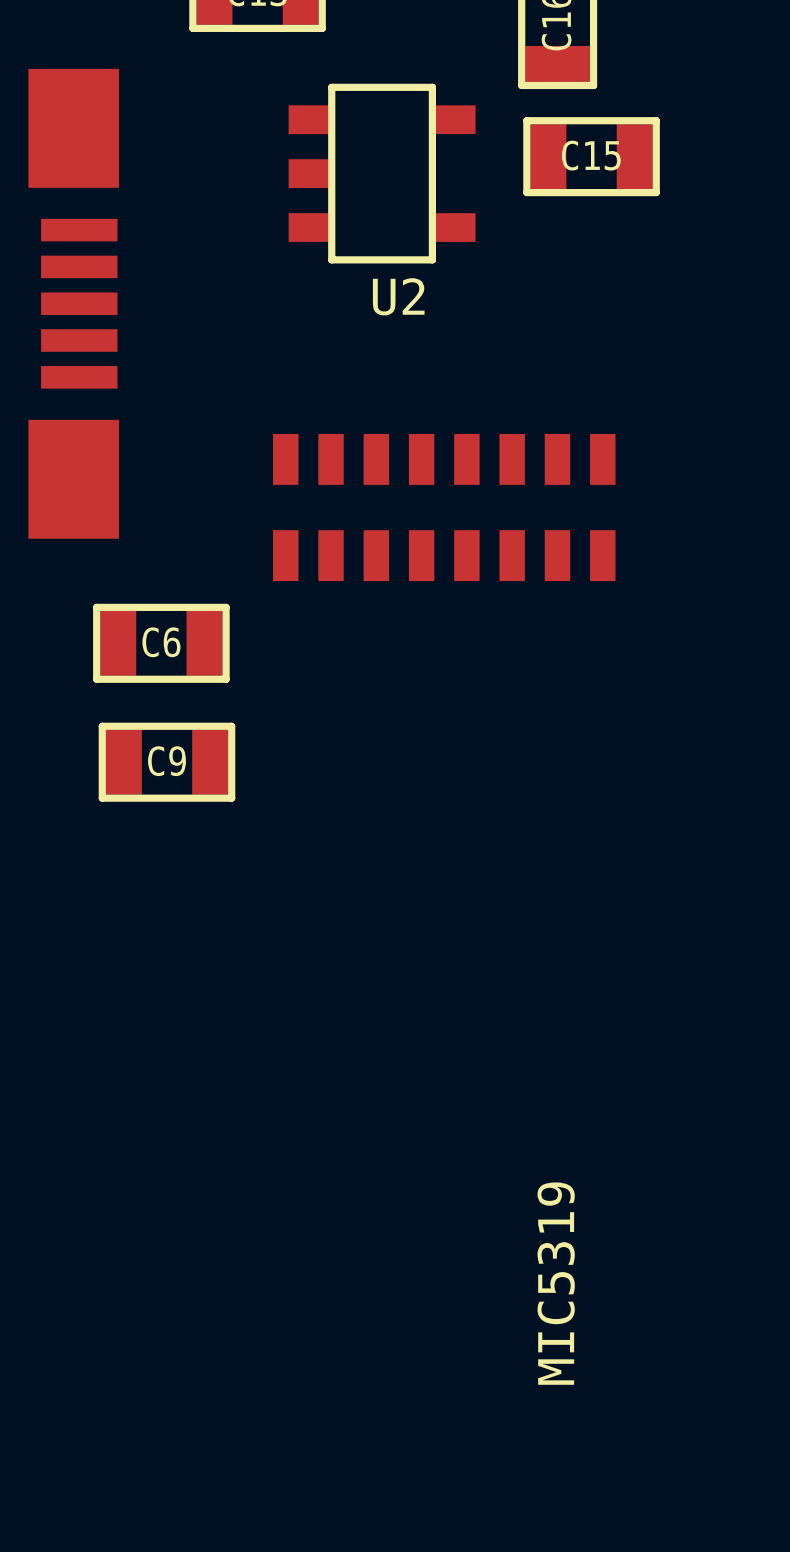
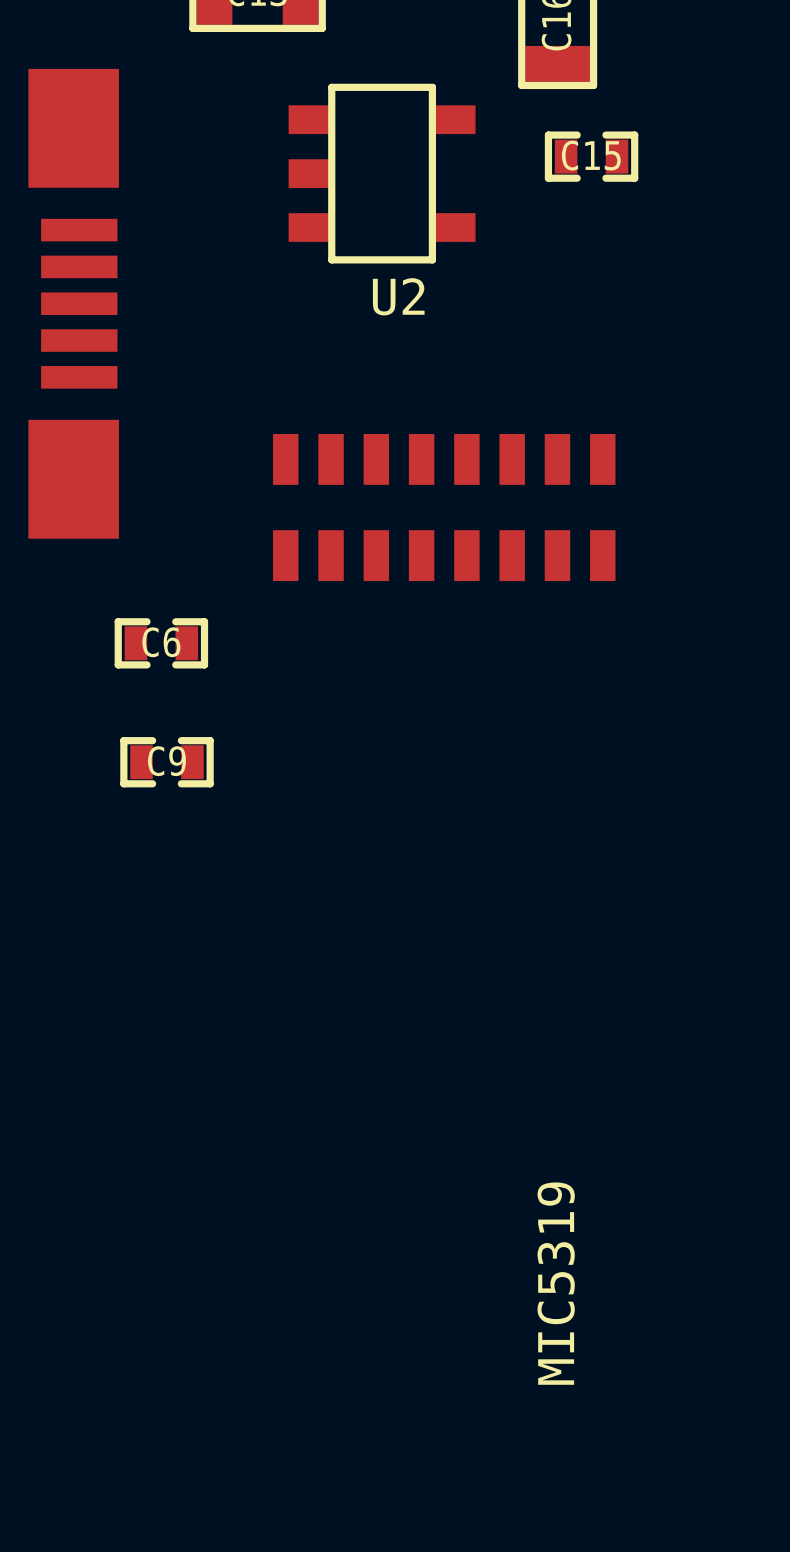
C15 footprint: [523, 117, 660, 197] -> [544, 131, 639, 182]
C6 footprint: [93, 603, 230, 683] -> [114, 618, 209, 669]
C9 footprint: [98, 722, 236, 802] -> [120, 737, 214, 788]

